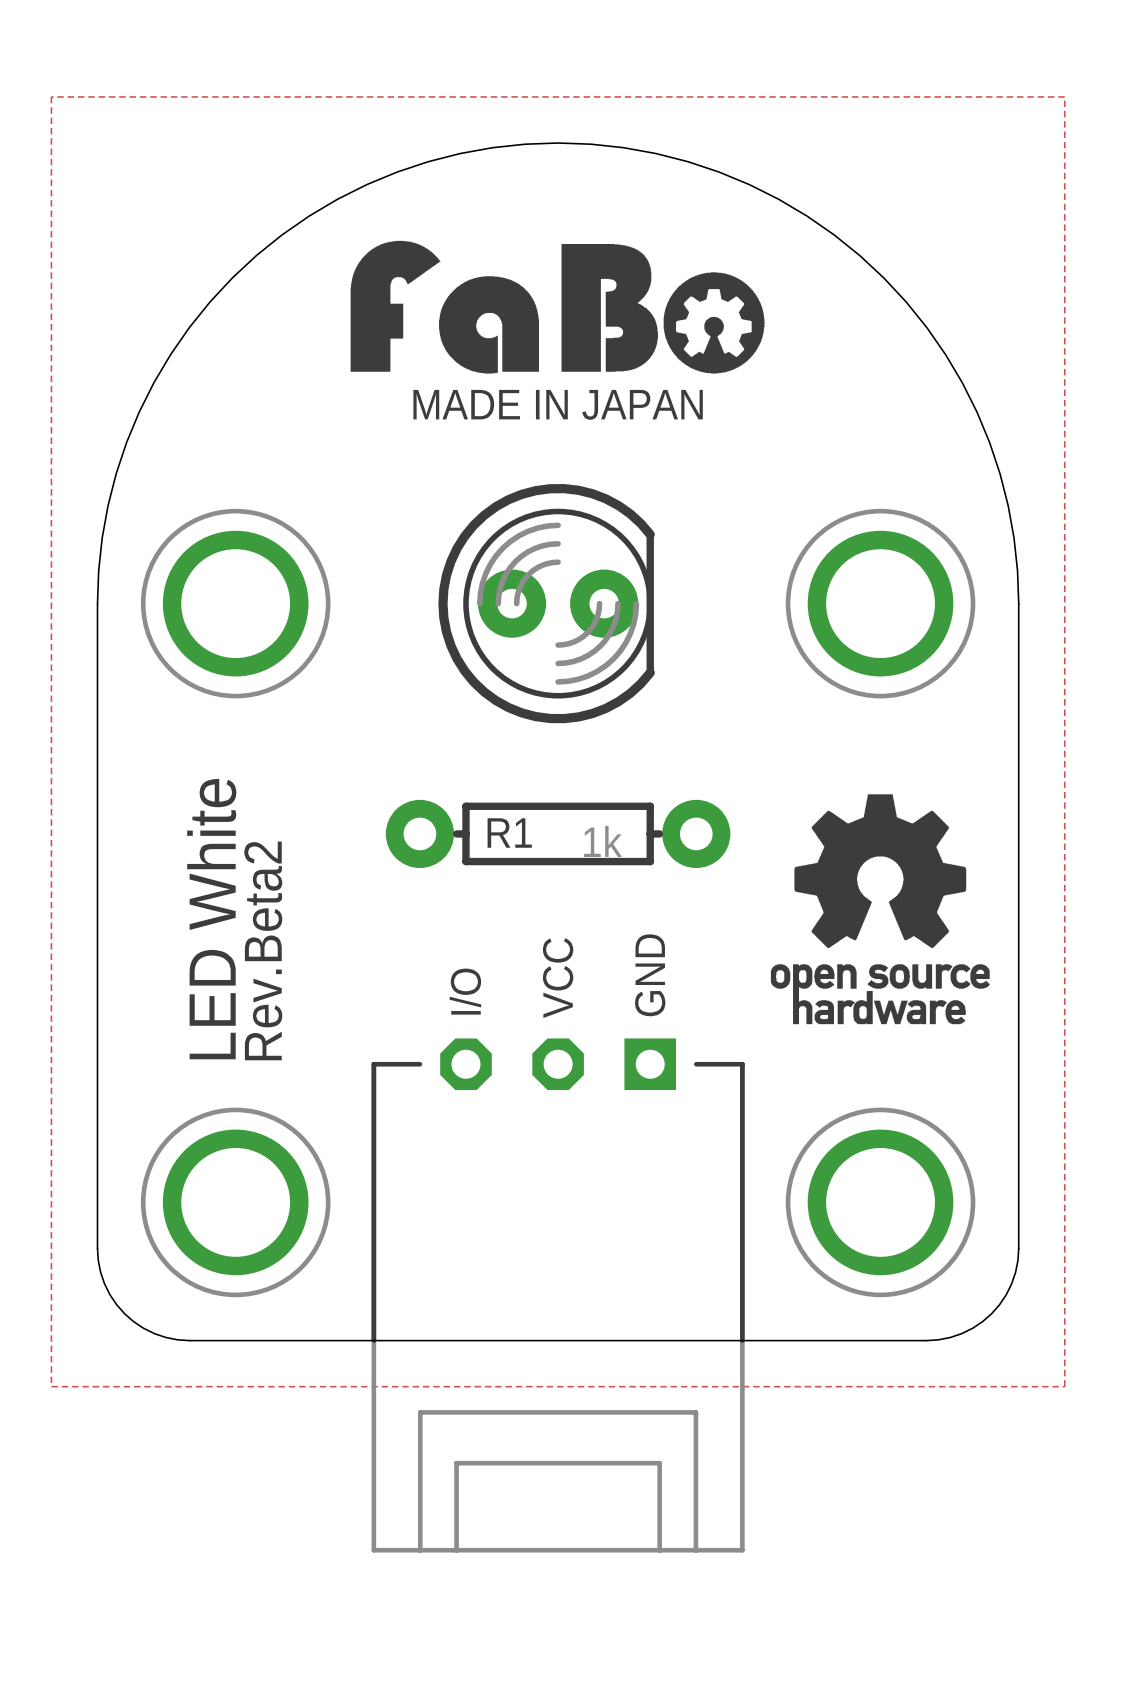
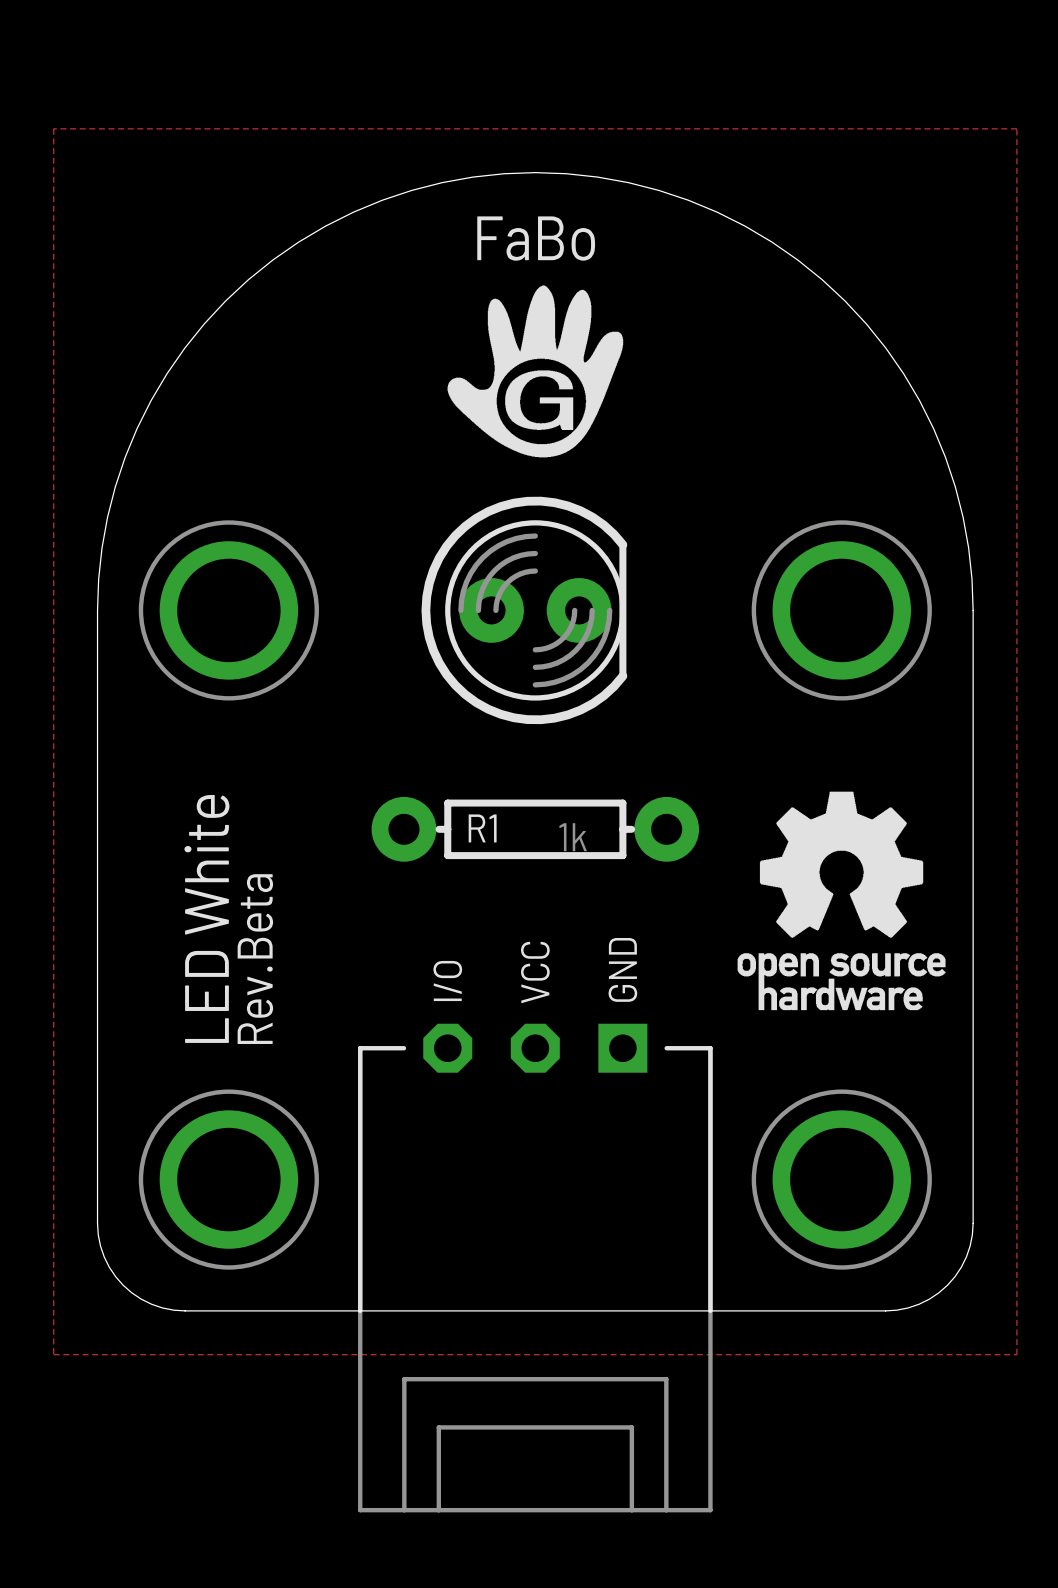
drawing: [350, 240, 765, 374] -> none
drawing: none -> [447, 285, 624, 458]
text: MADE IN JAPAN (558, 404) -> none
text: Rev.Beta2 (263, 950) -> Rev.Beta (255, 959)

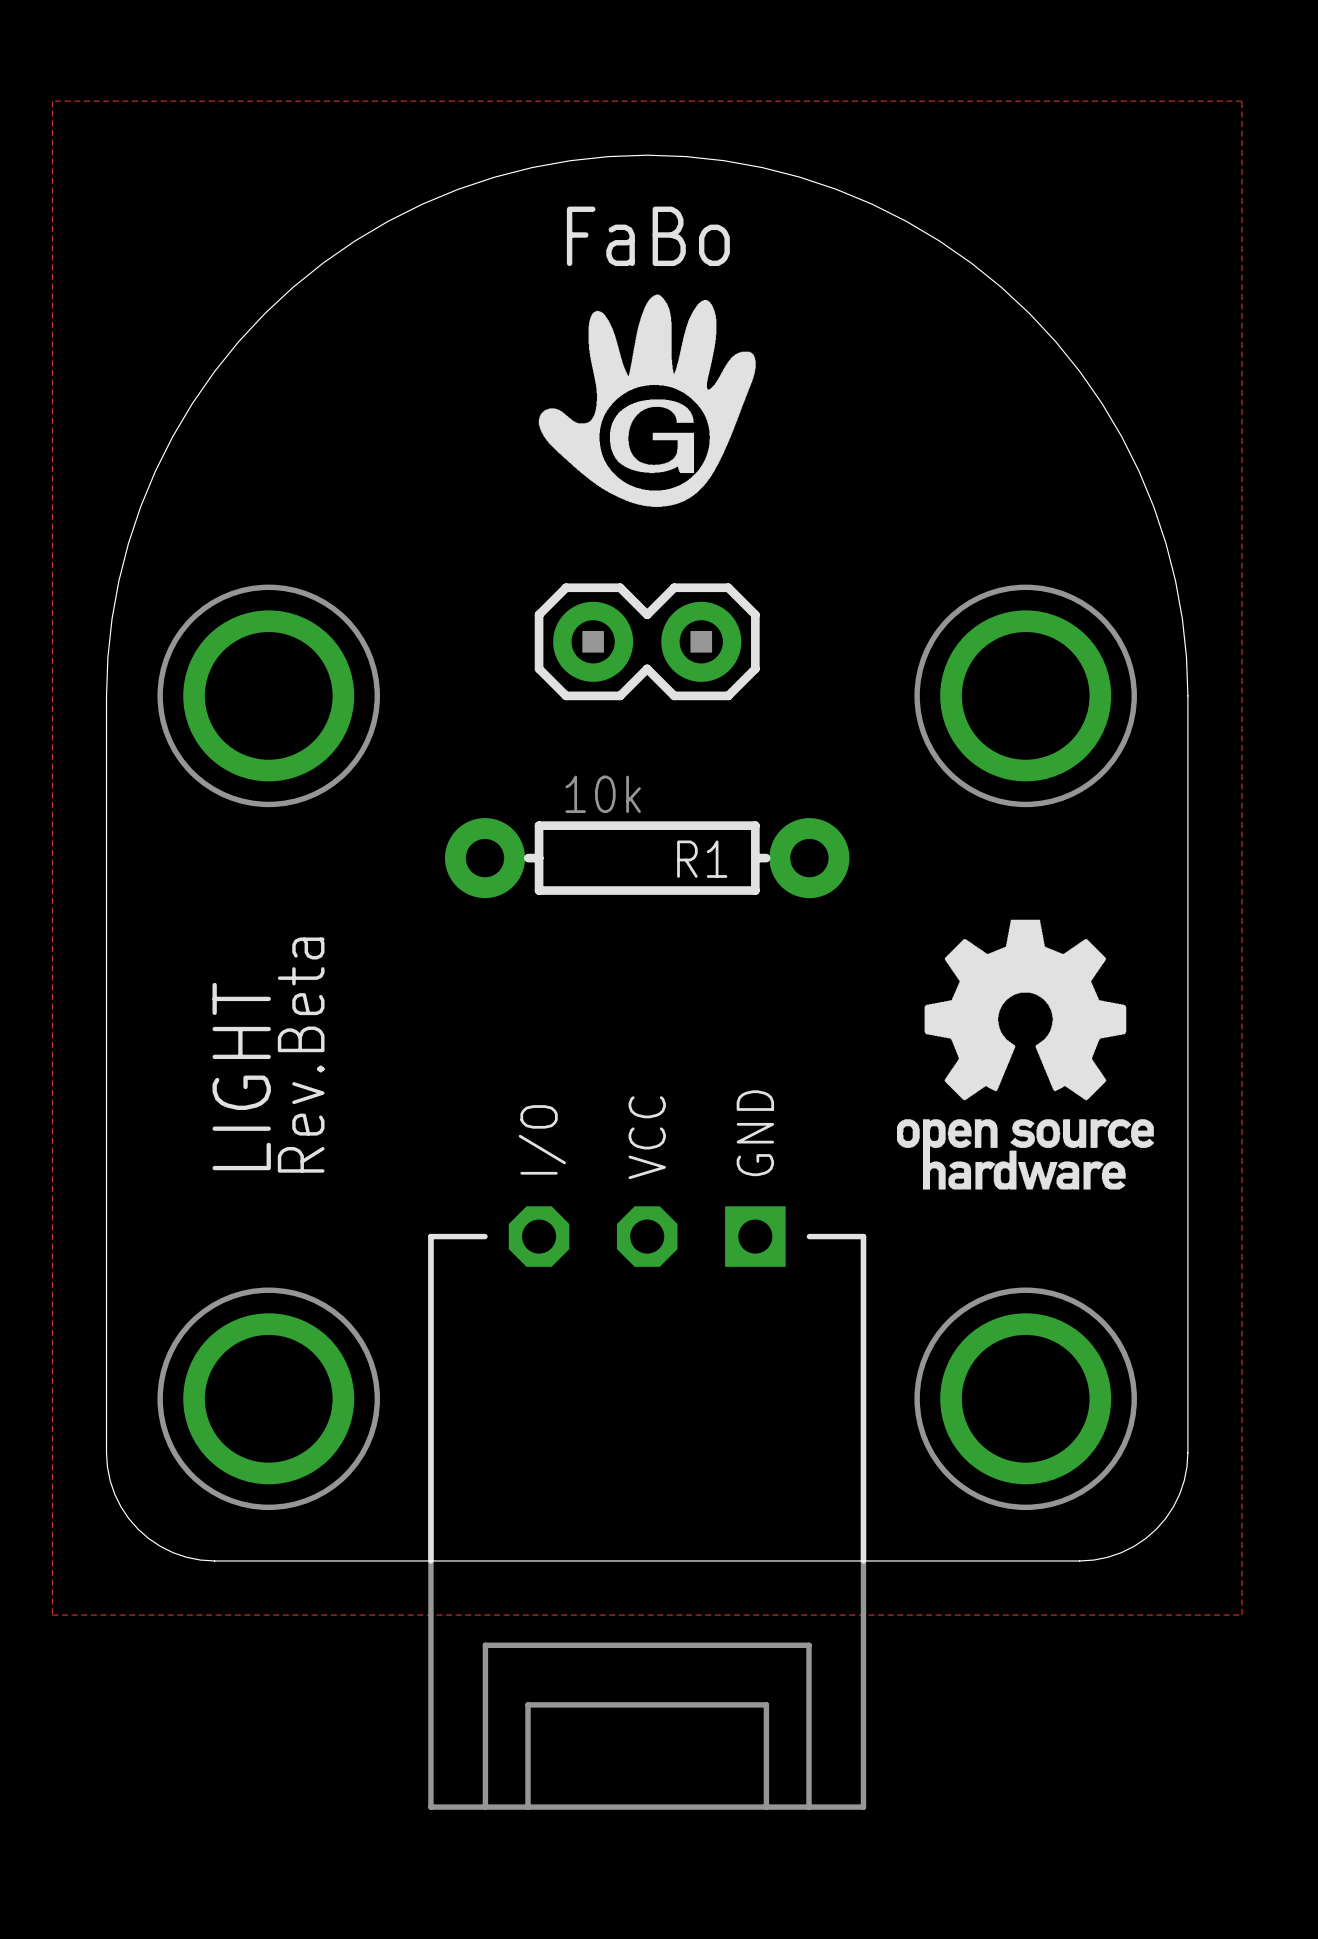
part: none -> (647, 641)
part: (524, 610) -> none
R1 name position: R1 (482, 828) -> R1 (702, 859)
R1 position: (535, 829) -> (647, 858)
R1 value: 1k (573, 837) -> 10k (603, 794)
text: LED White (206, 918) -> none
text: none -> LIGHT (241, 1076)
text position: Rev.Beta (255, 959) -> Rev.Beta (301, 1055)

